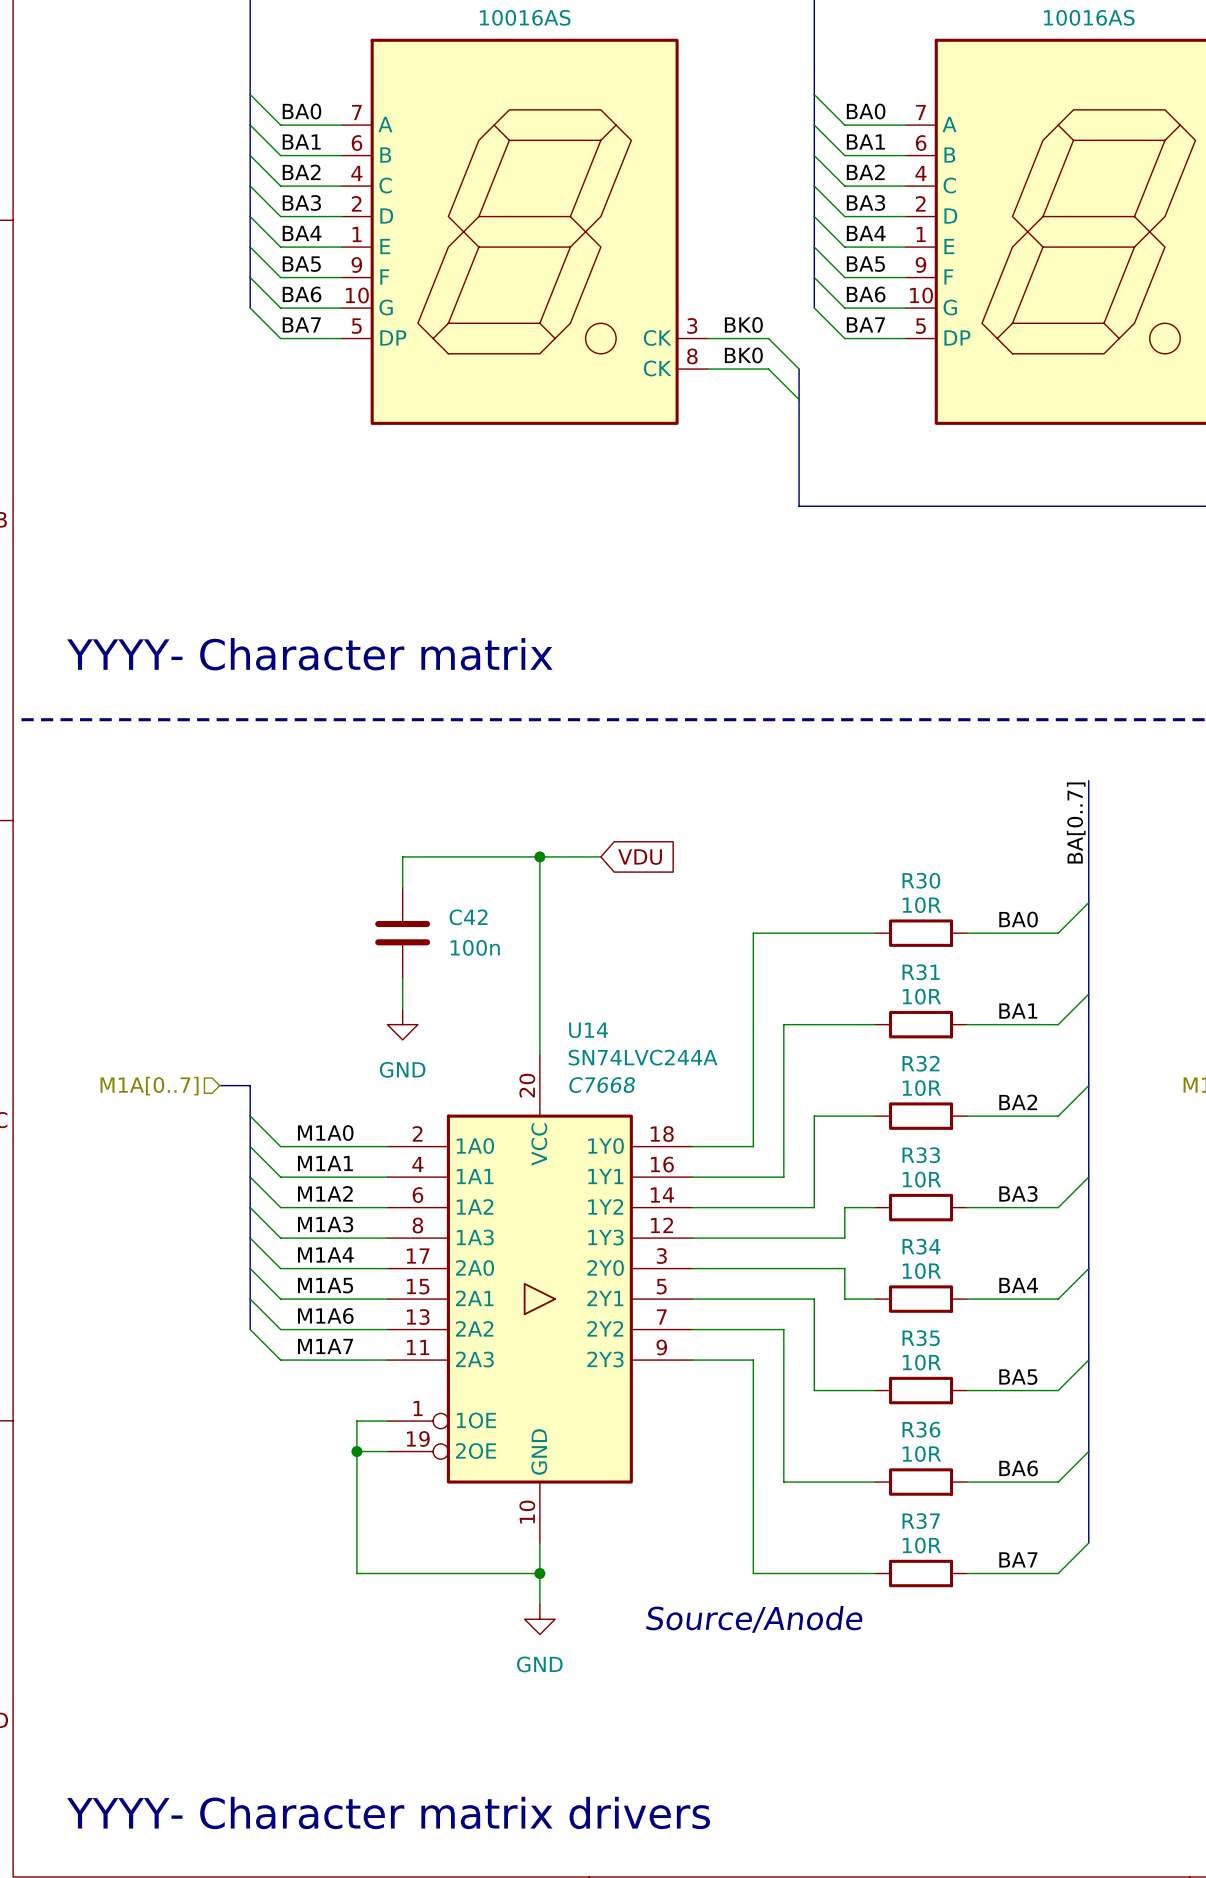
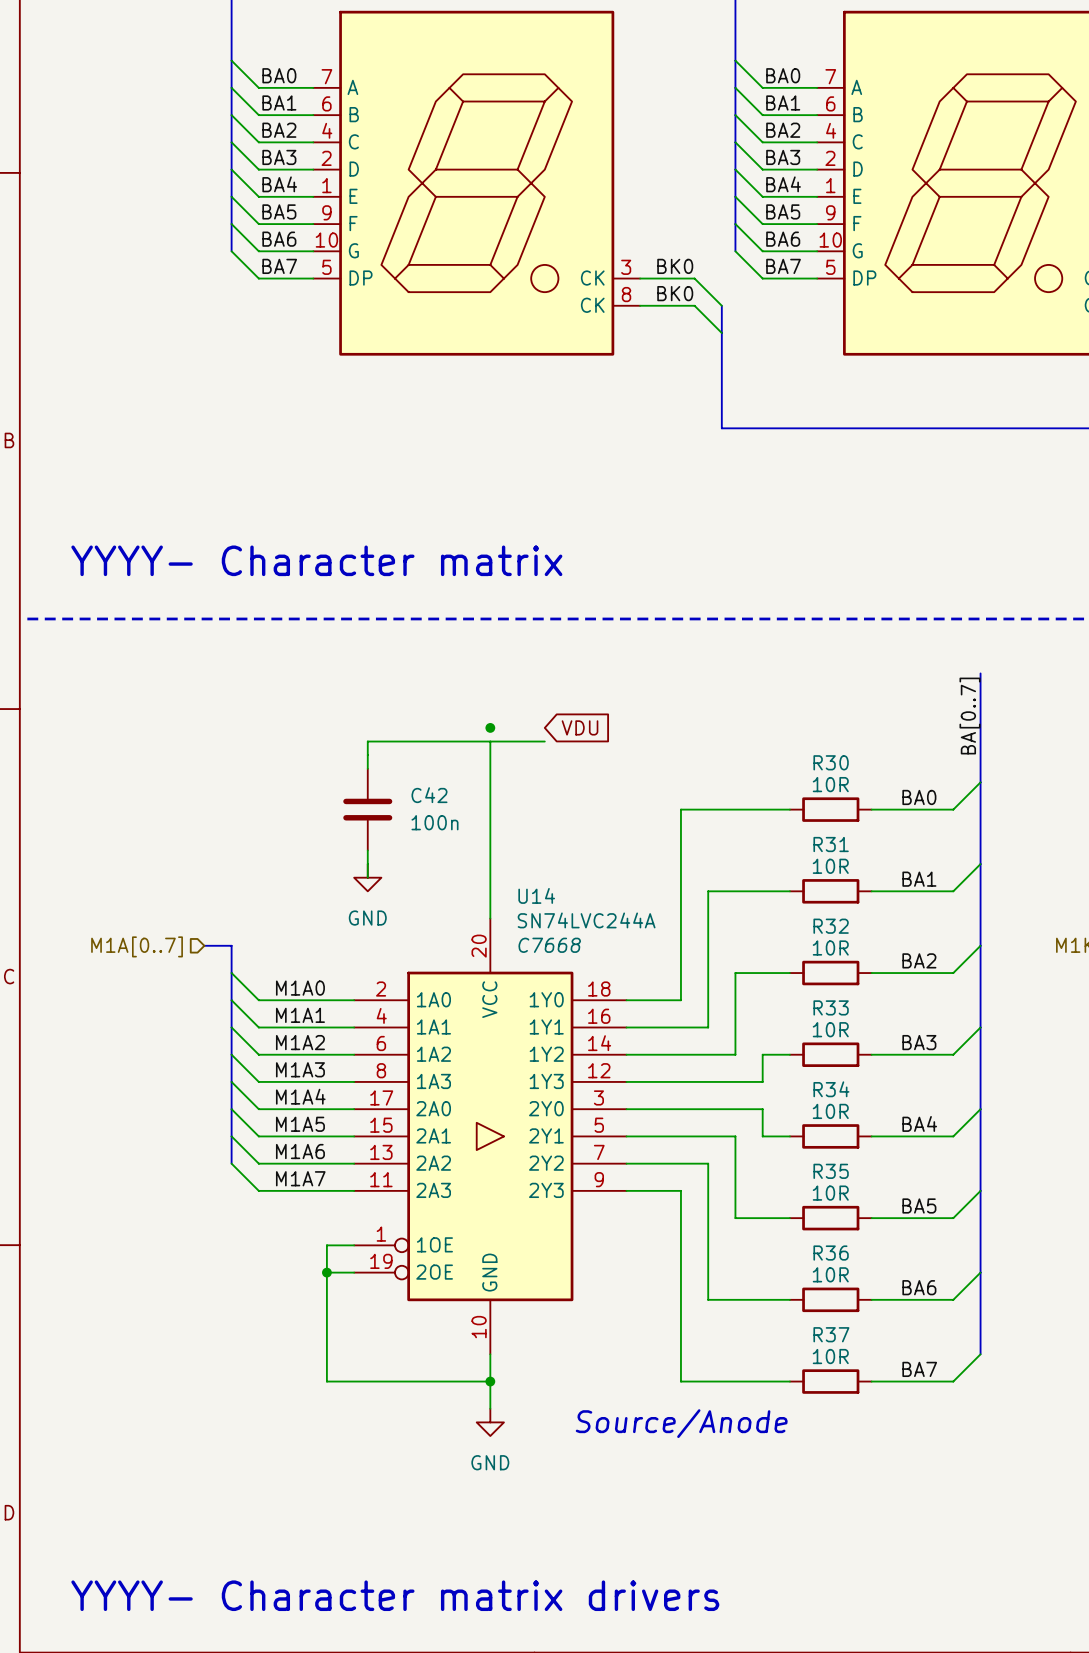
junction position: (539, 856) -> (490, 727)
global label position: VDU (640, 857) -> VDU (580, 727)
power symbol position: GND (402, 1024) -> GND (367, 877)

